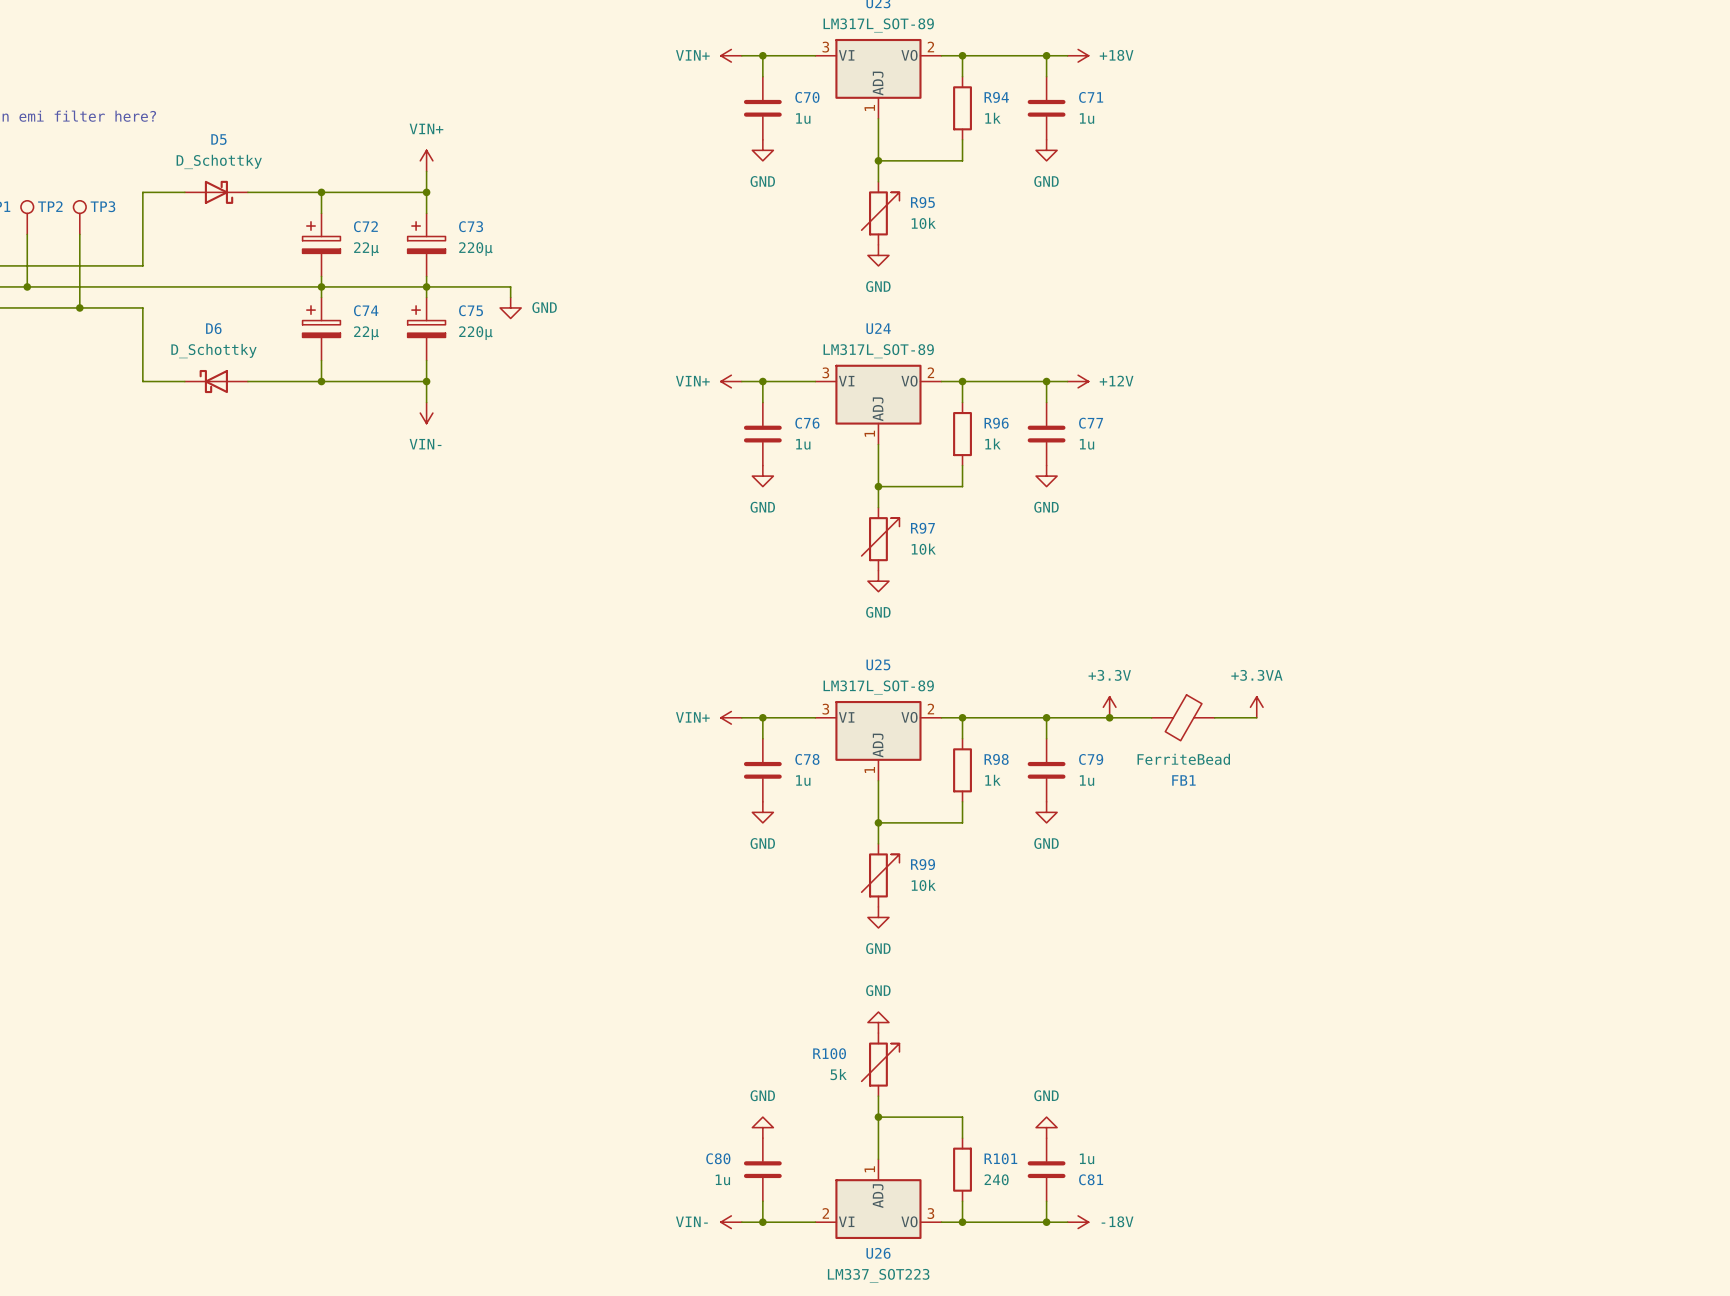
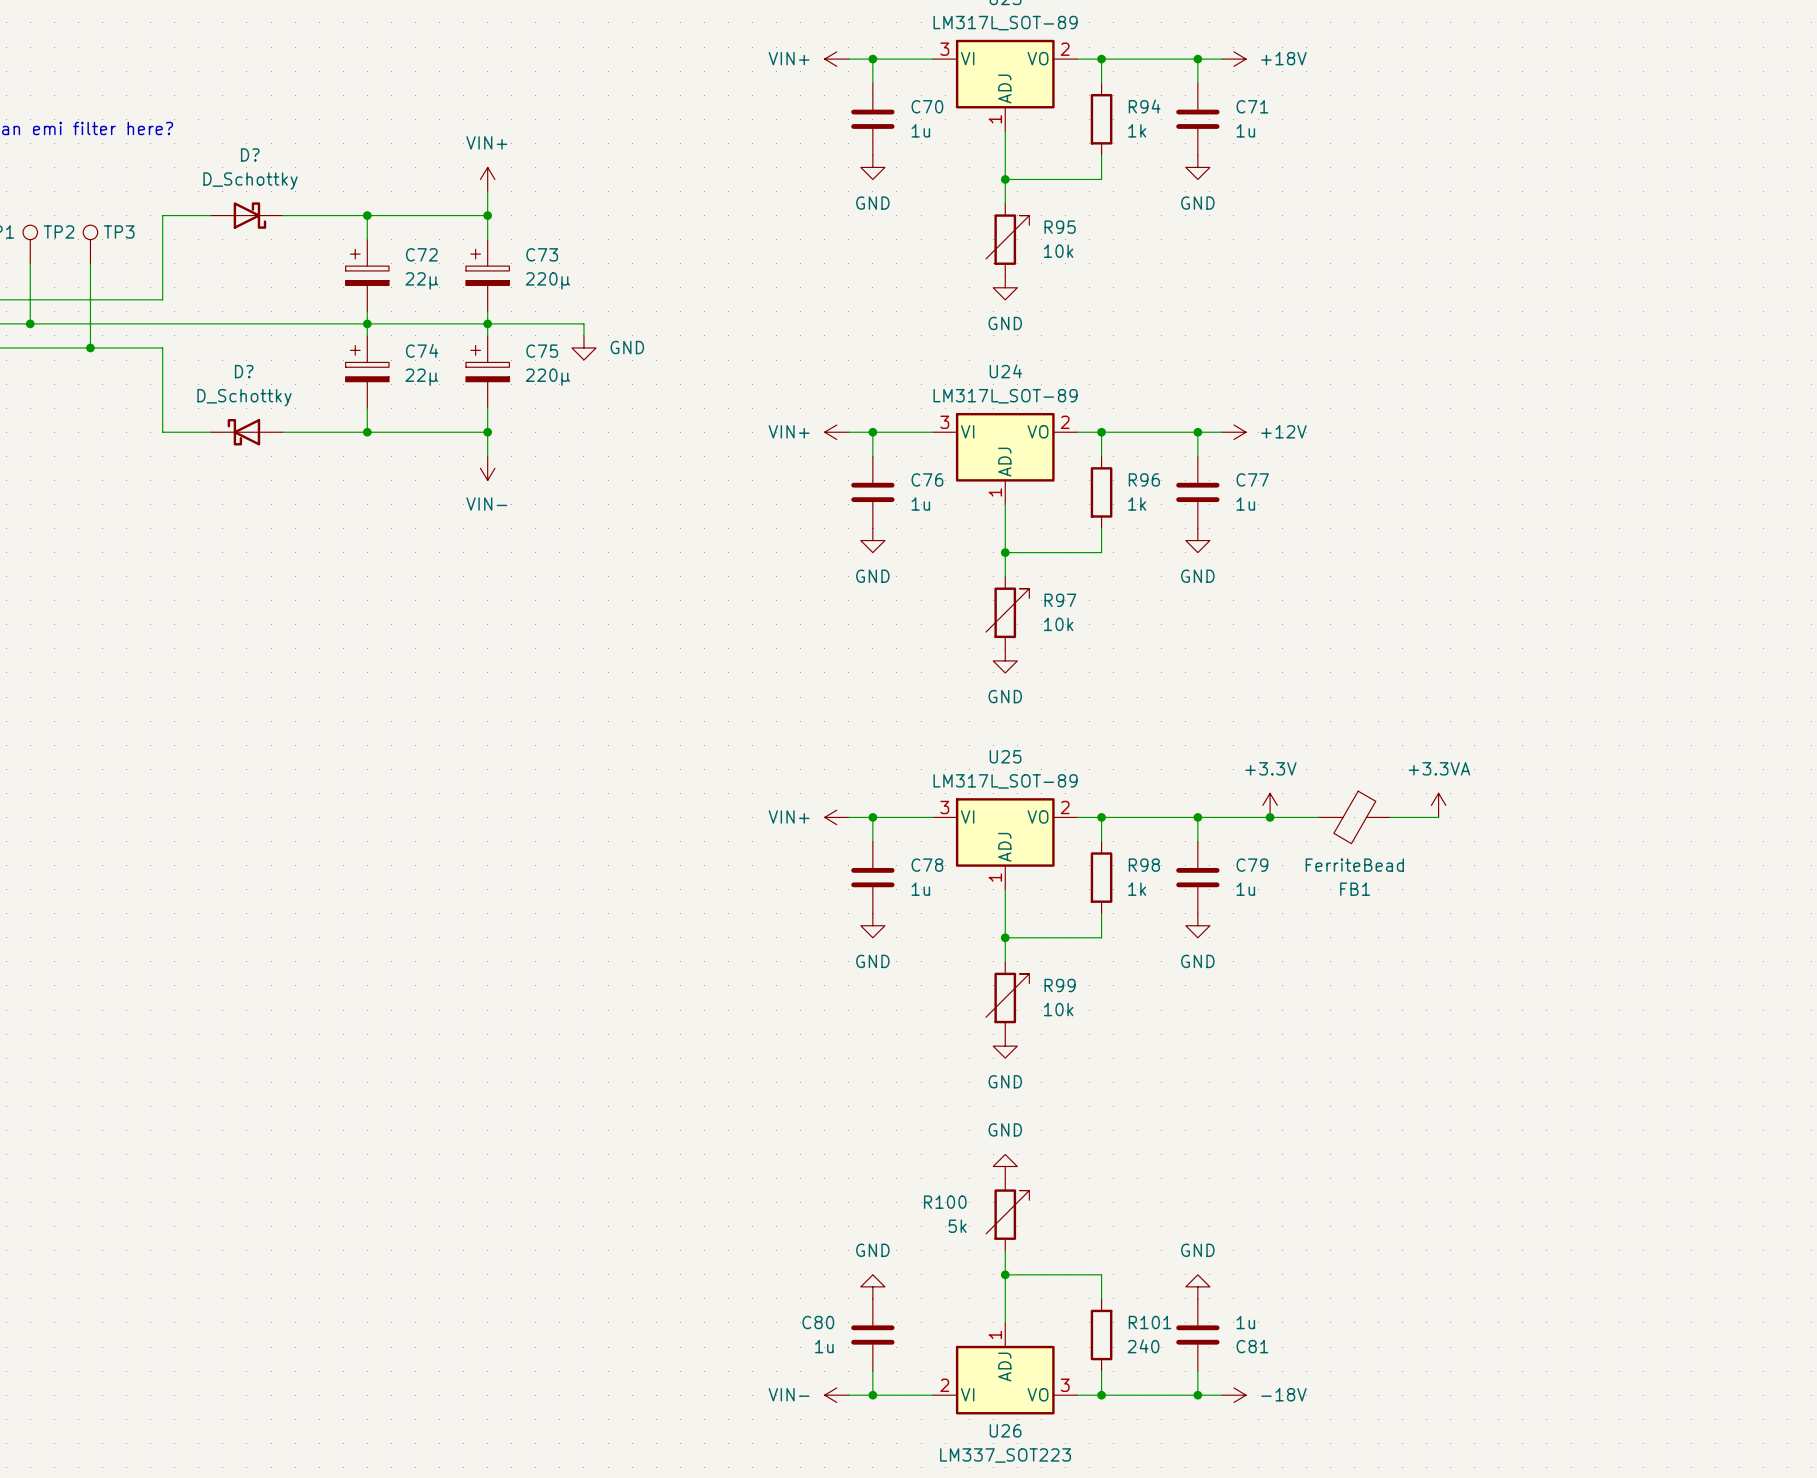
D5 name: D5 (218, 139) -> D? (250, 154)
D6 name: D6 (213, 328) -> D? (244, 371)

